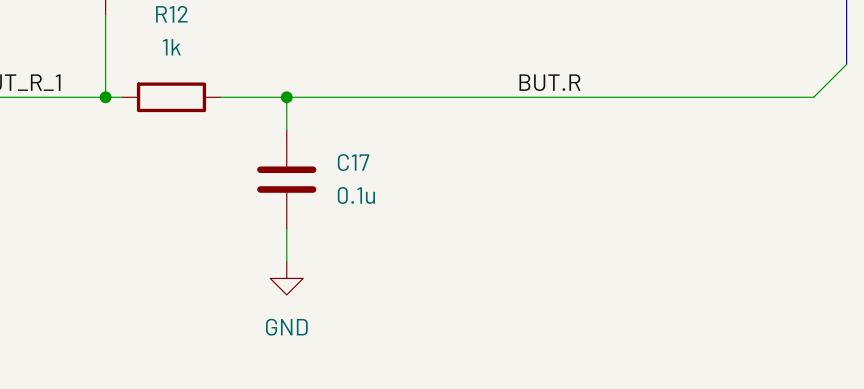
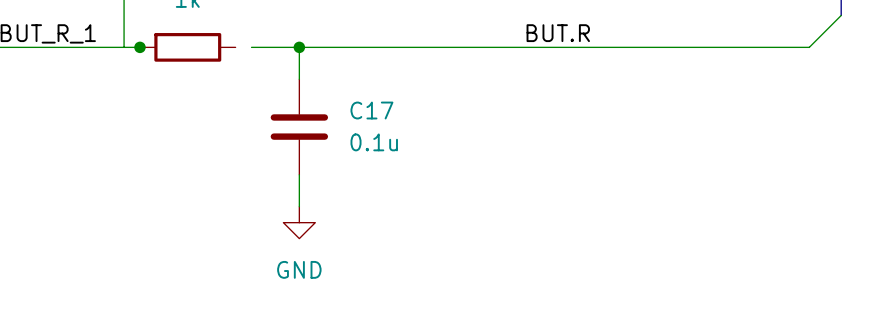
junction position: (105, 97) -> (139, 47)
wire: (220, 97) (237, 97) -> none

